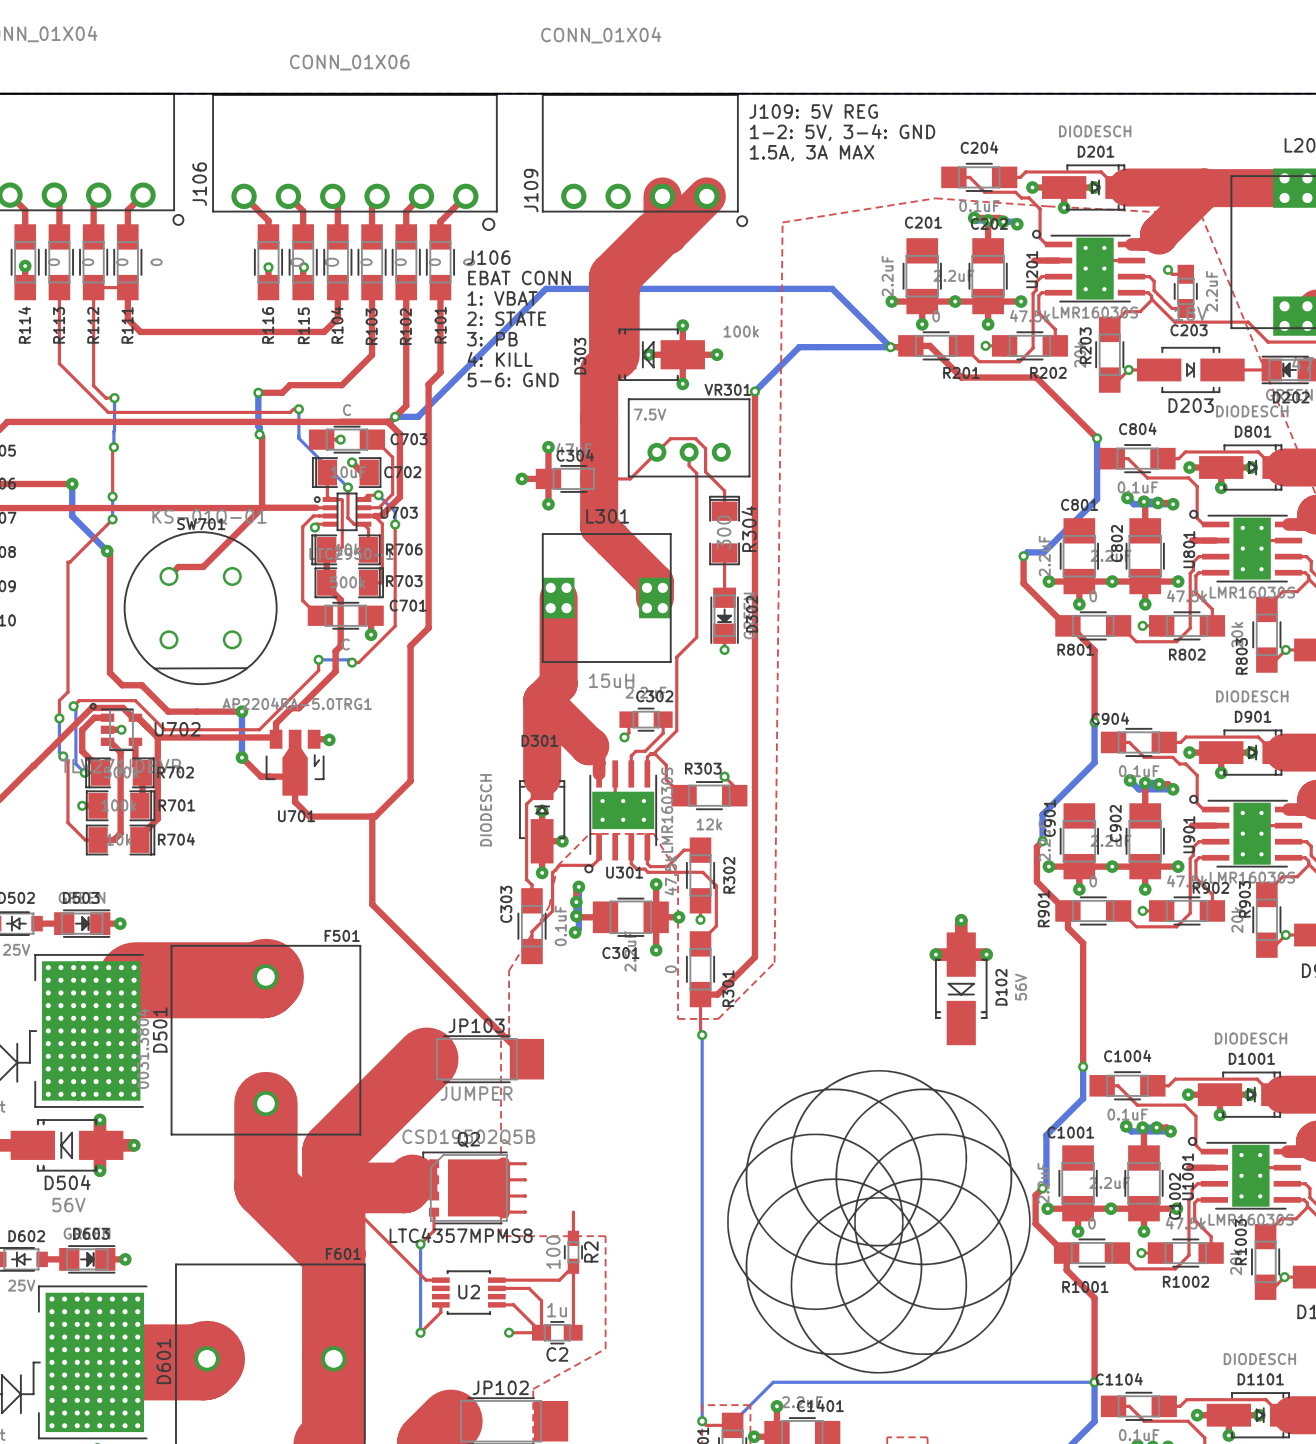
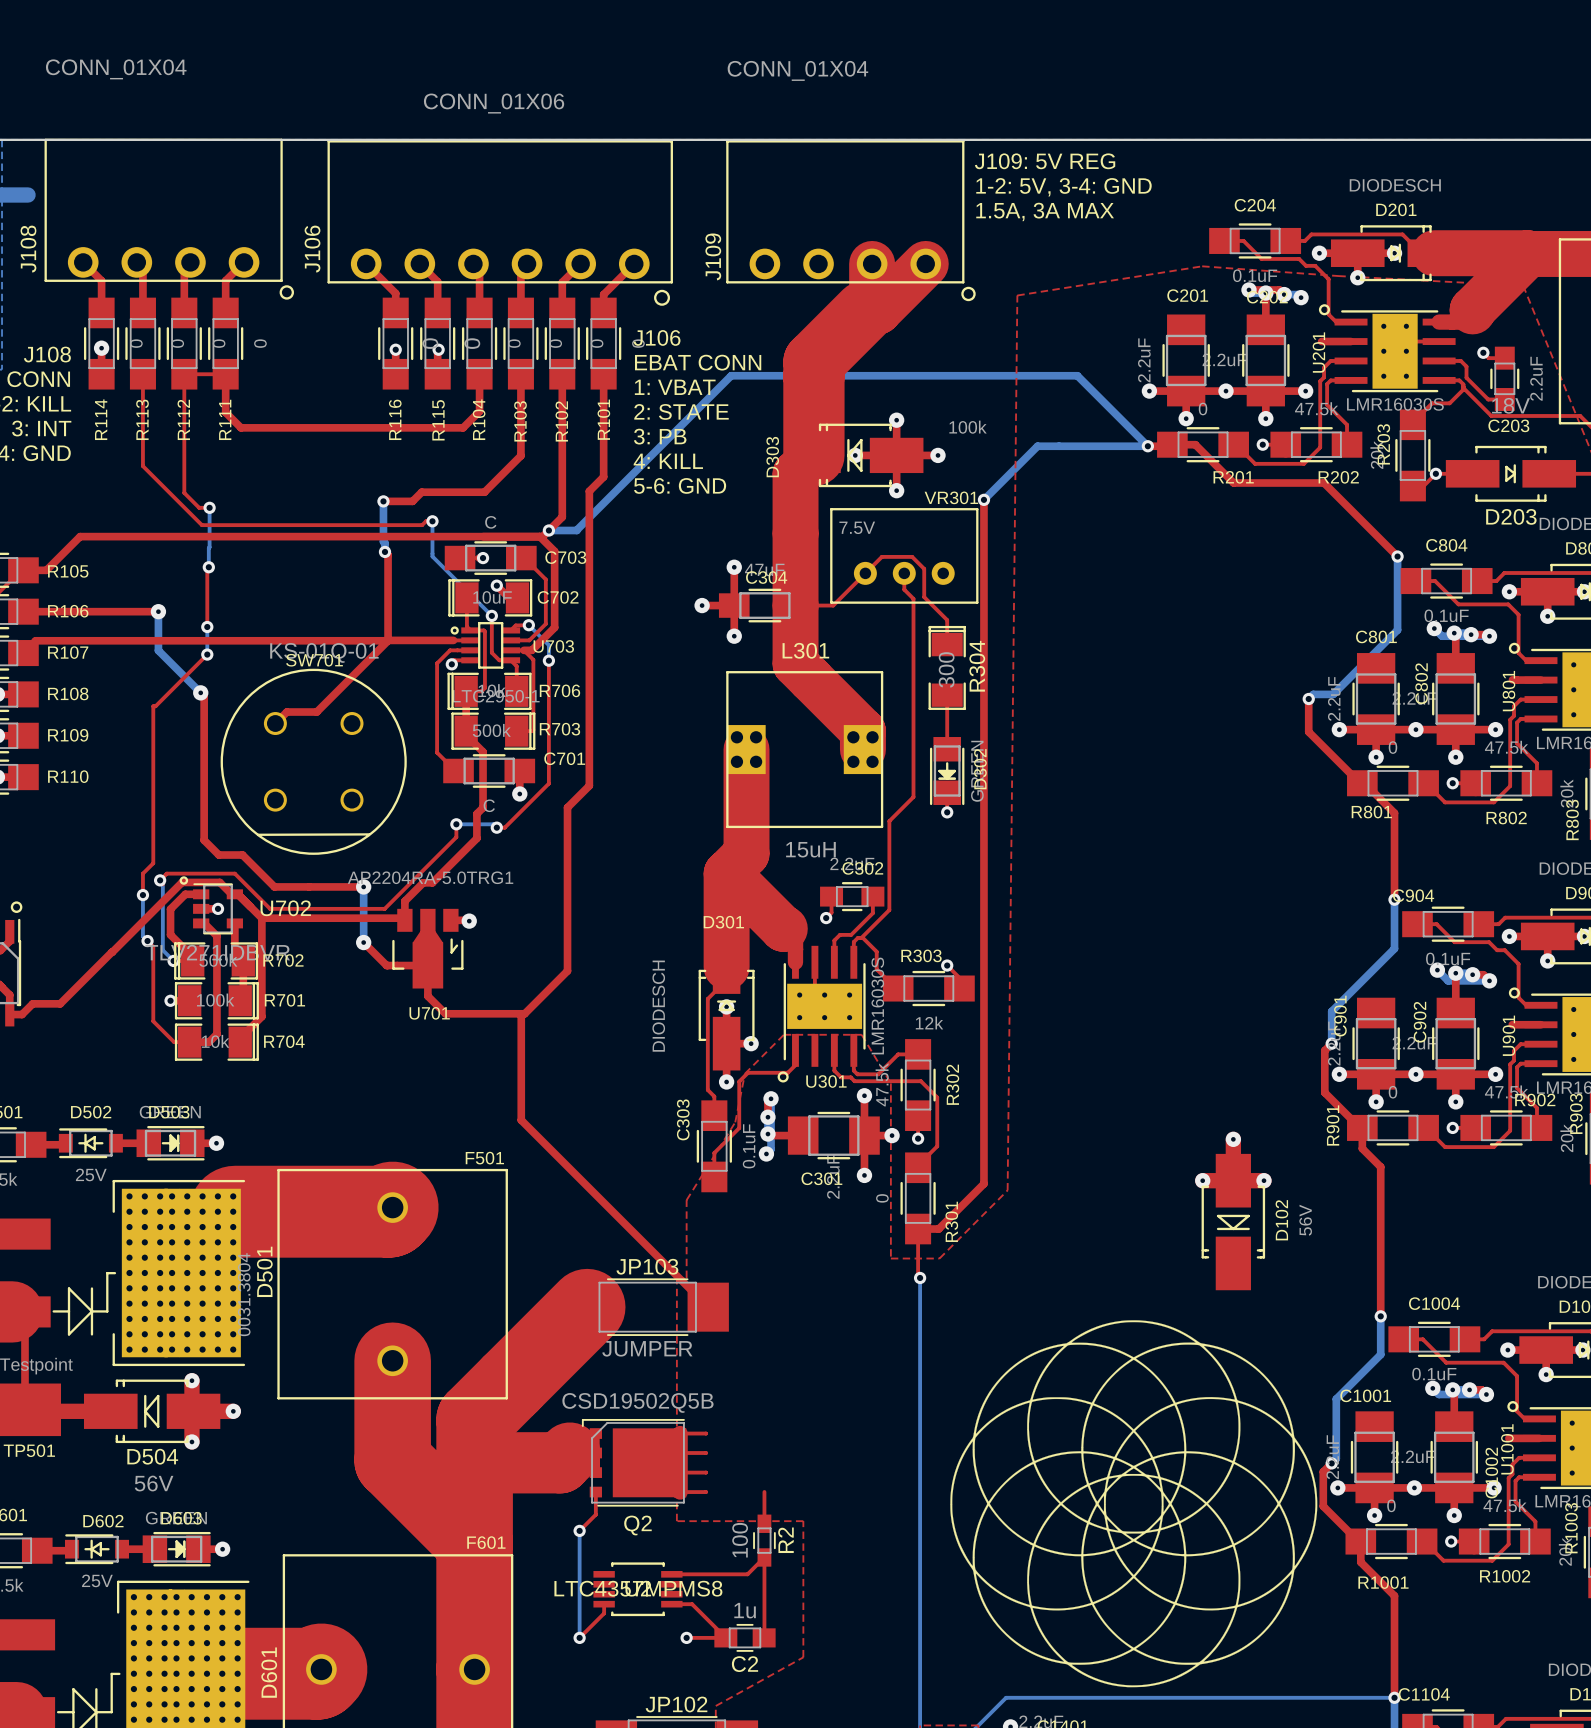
Q2 name position: Q2 (468, 1139) -> Q2 (637, 1525)
top track: (333, 1187) (425, 1280) (440, 1280) -> none
U2 value position: LTC4357MPMS8 (461, 1235) -> LTC4357MPMS8 (638, 1588)
top track: (496, 1288) (529, 1288) (541, 1300) (541, 1332) -> none

